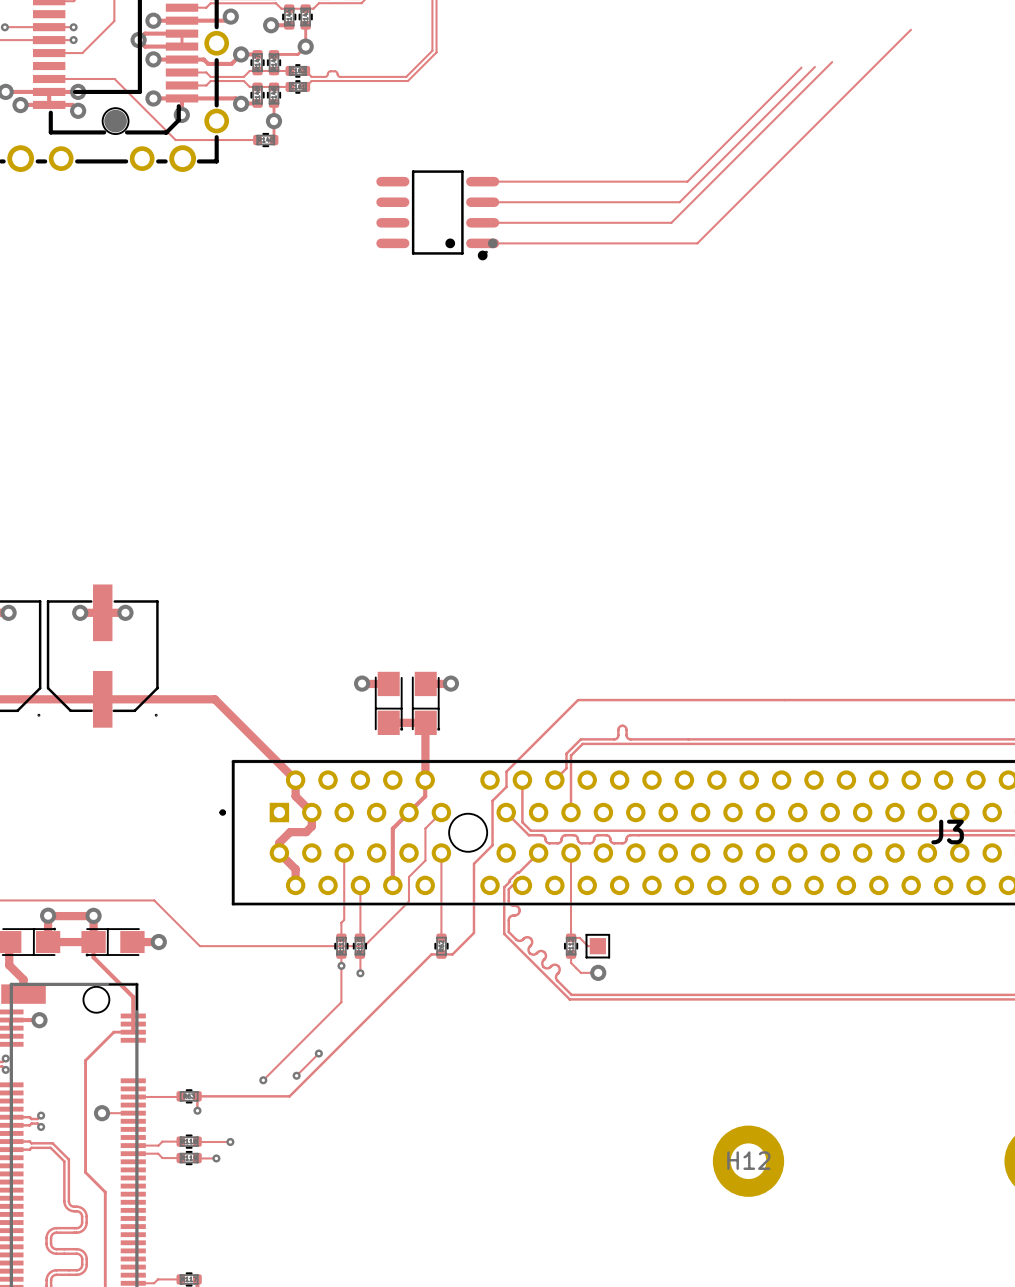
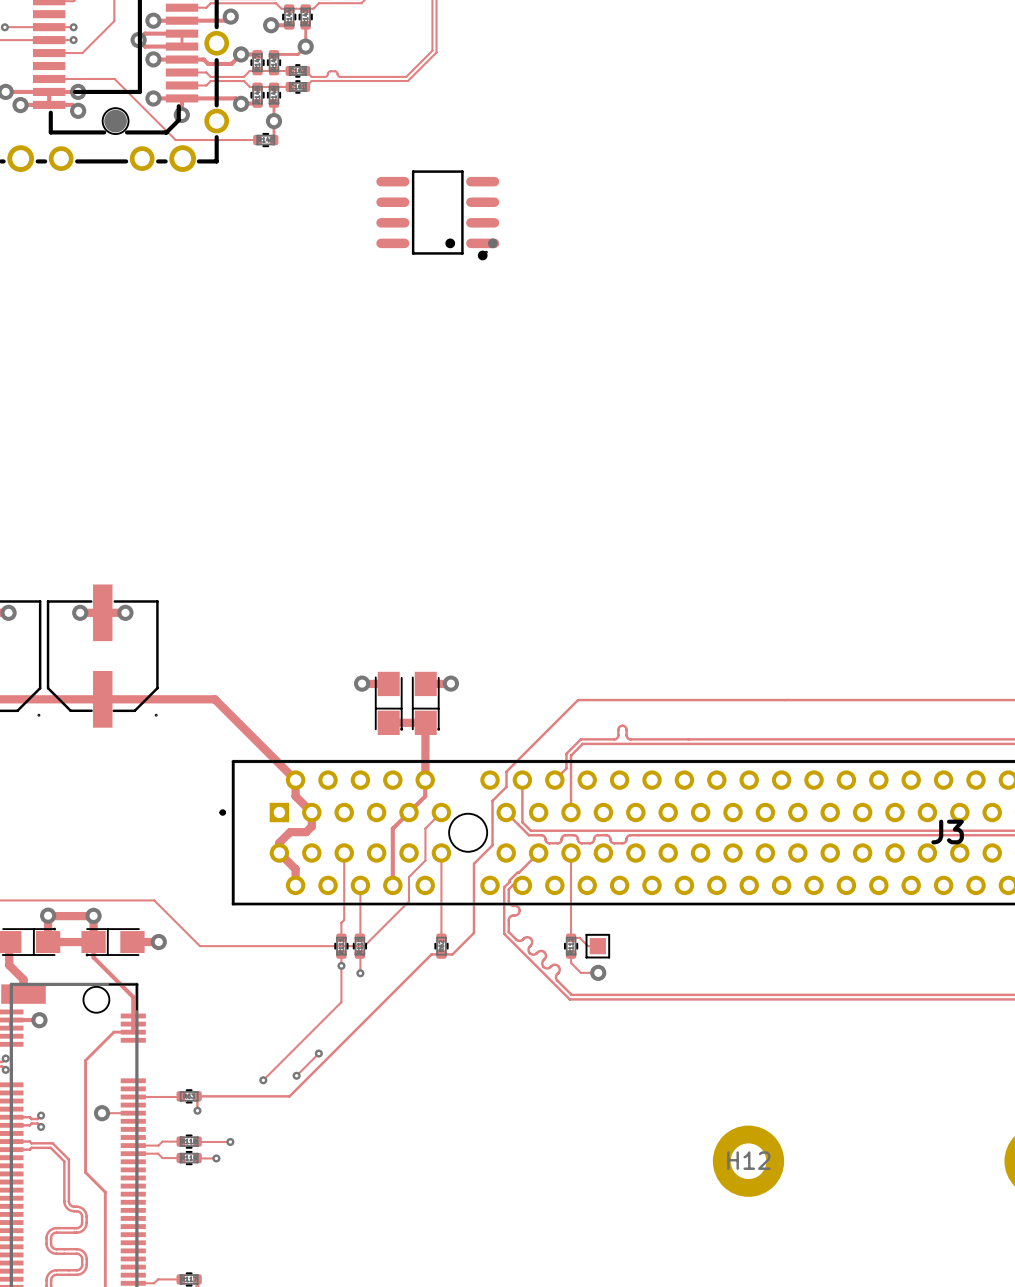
track: (910, 29) (697, 243) (482, 243) -> none
track: (832, 62) (671, 222) (482, 222) -> none
track: (801, 67) (687, 181) (482, 181) -> none
track: (814, 67) (679, 202) (482, 202) -> none

